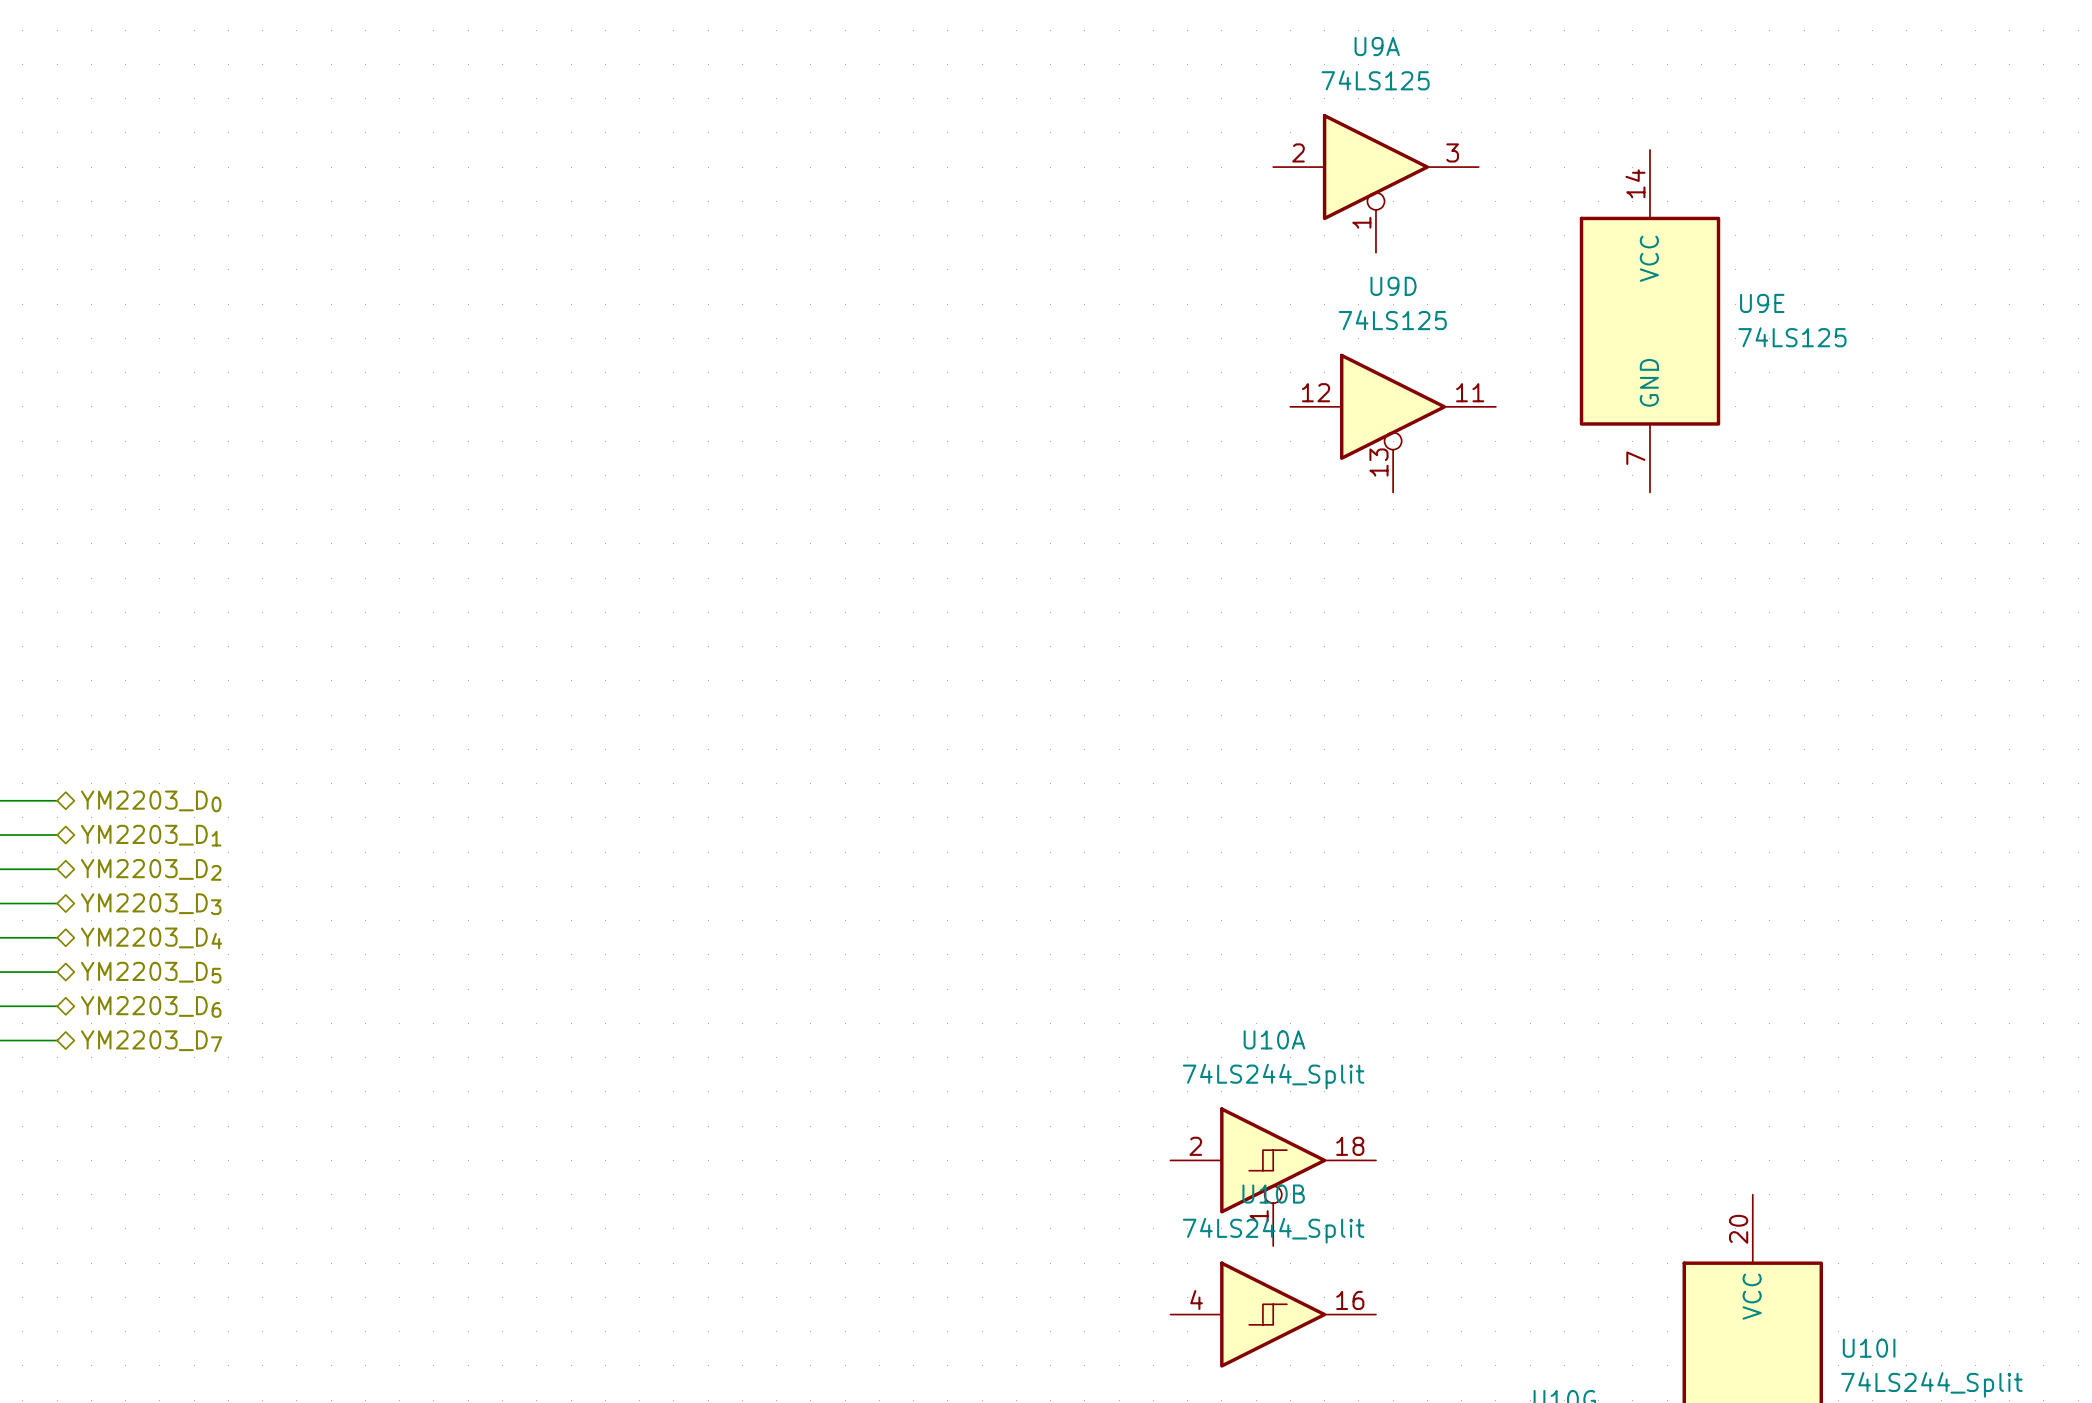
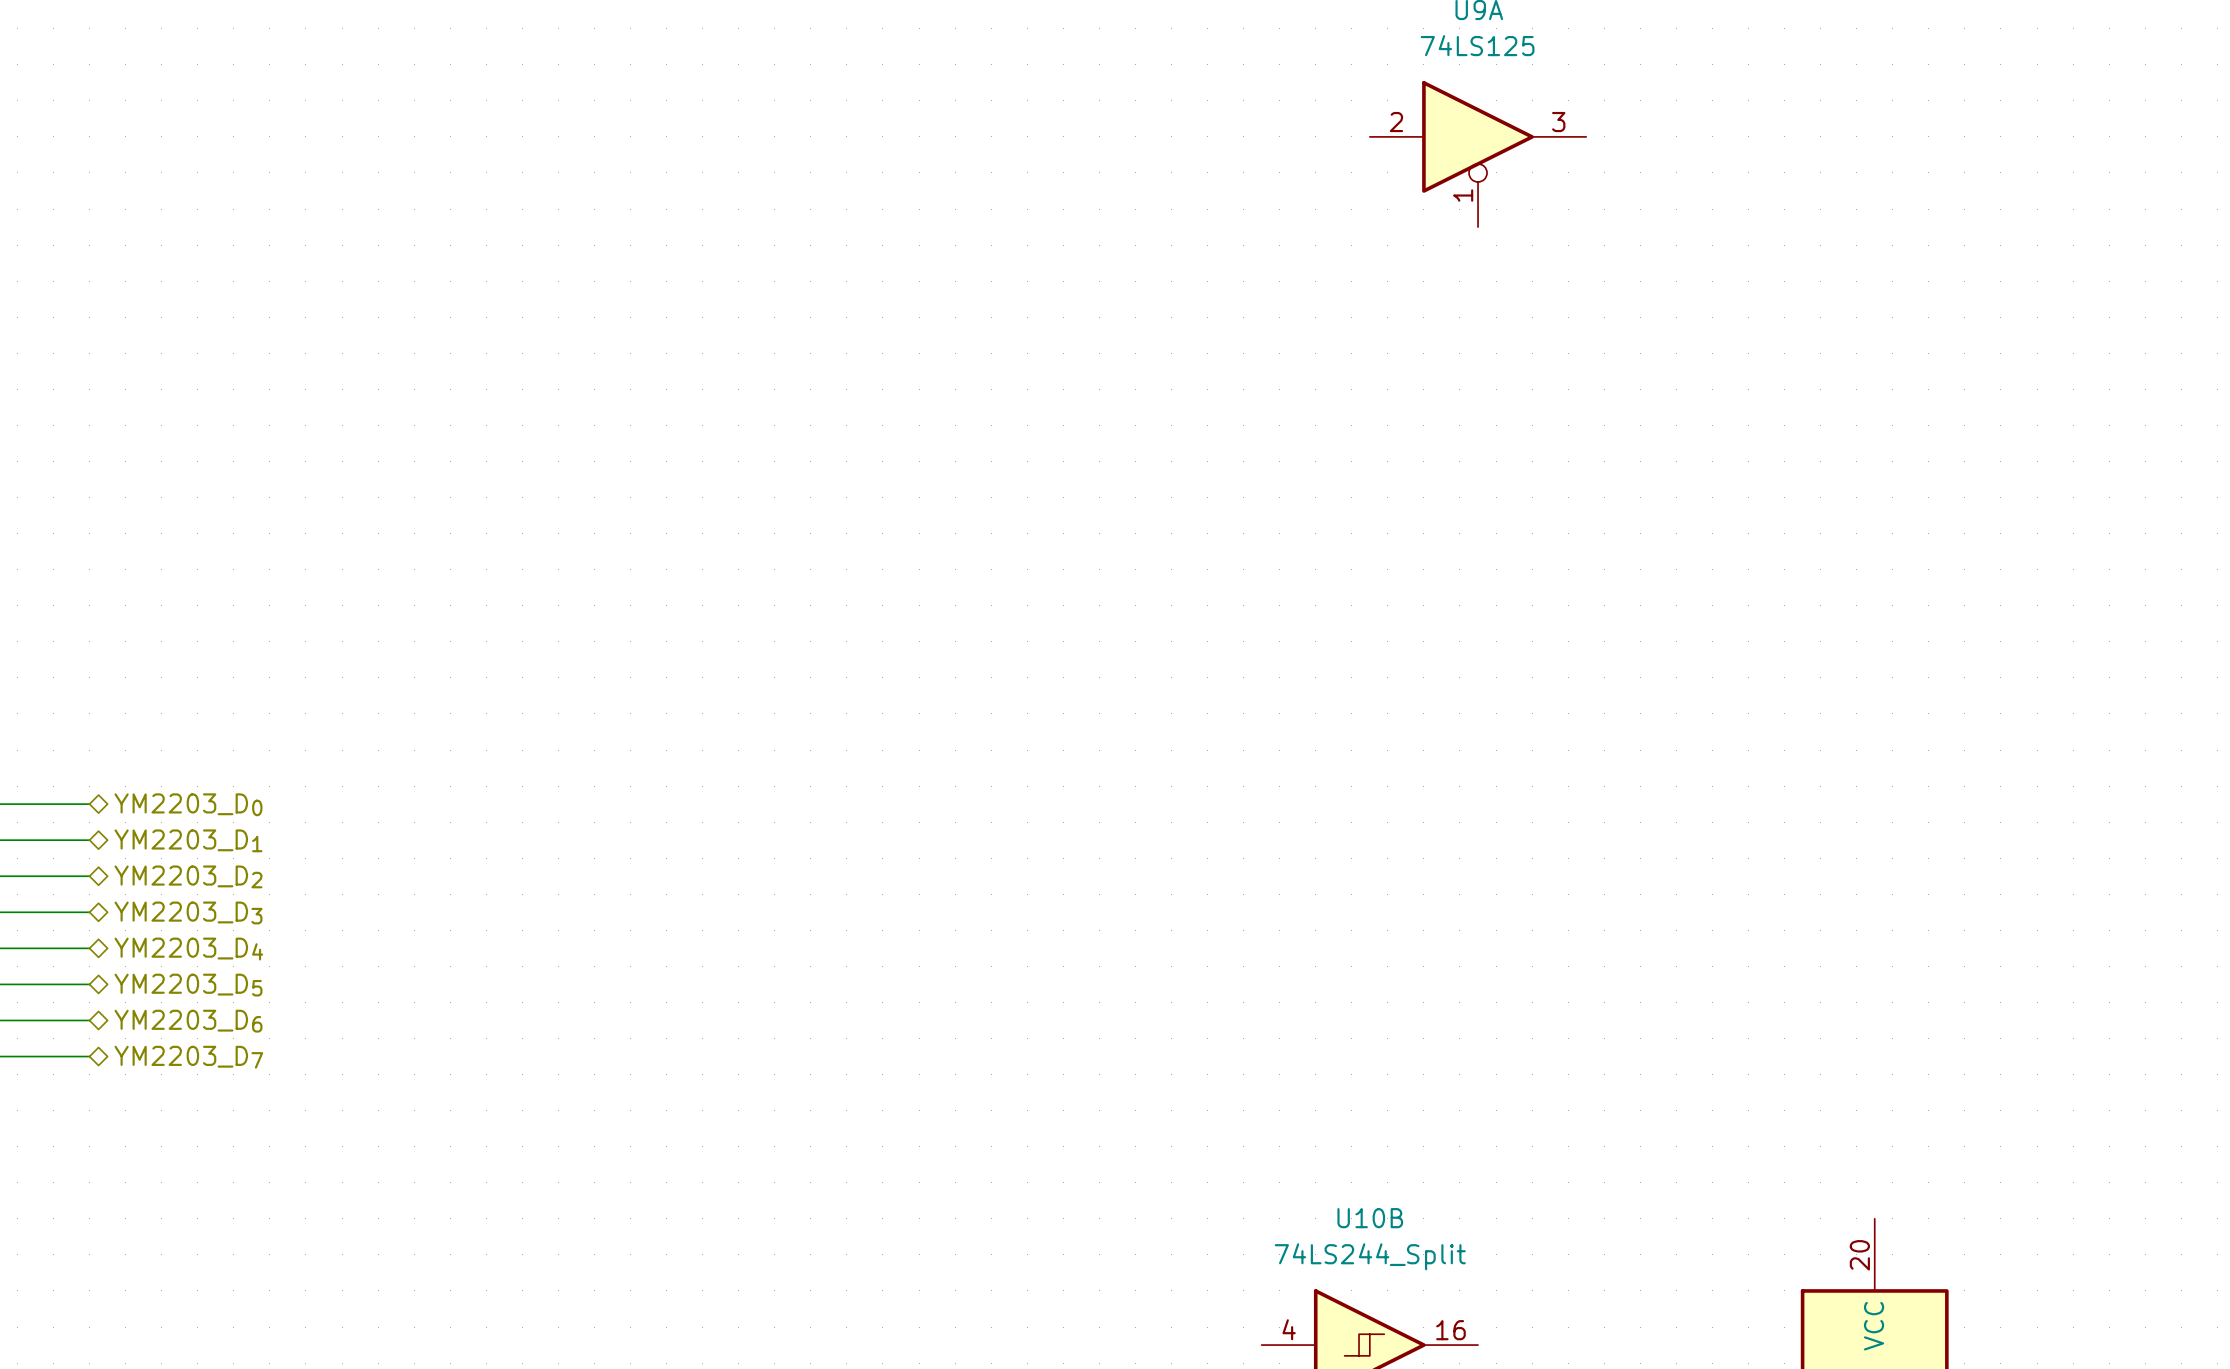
U9E: 74LS125 (1650, 321) -> none
U9D: 74LS125 (1393, 423) -> none
U10A: 74LS244_Split (1273, 1176) -> none

